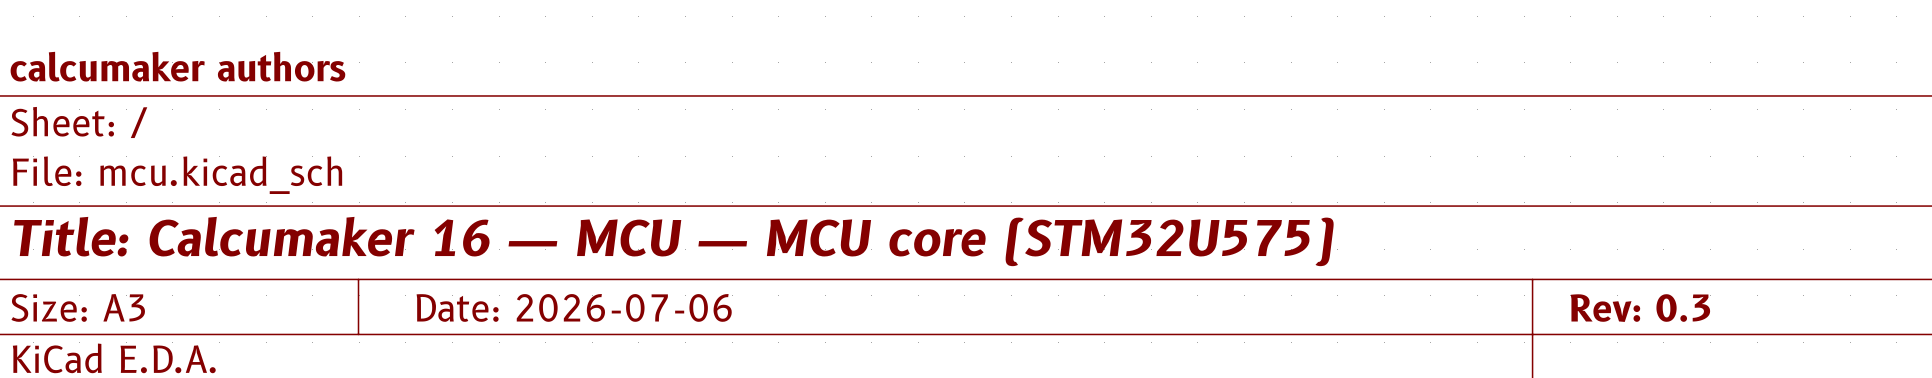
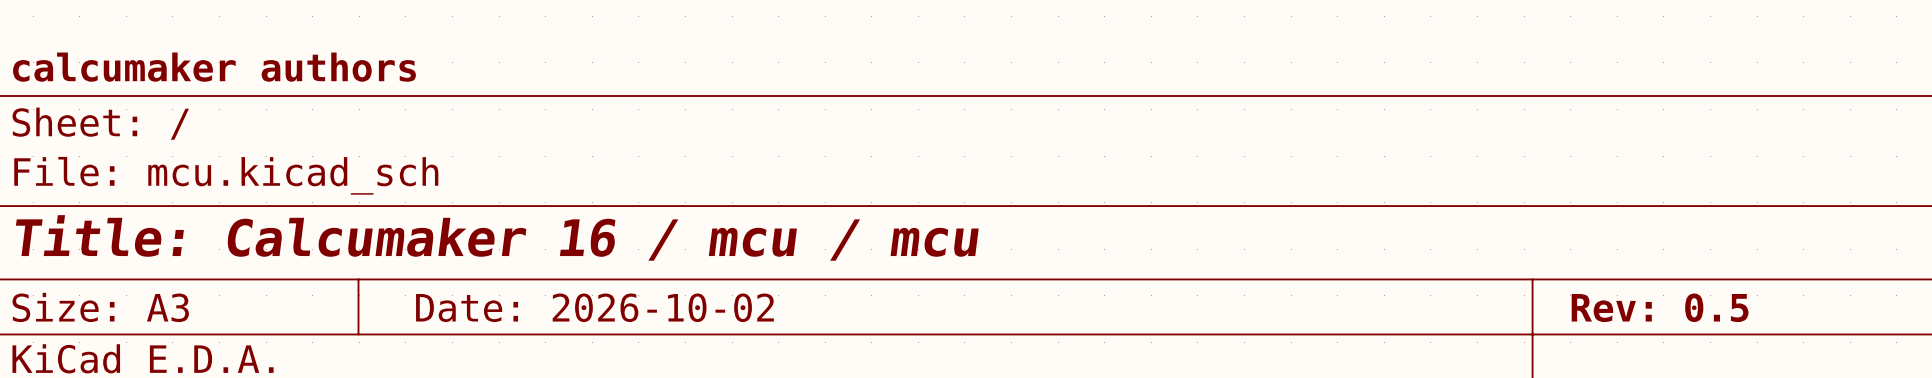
title block: Title: Calcumaker 16 — MCU — MCU core (STM32U575) (673, 241) -> Title: Calcumaker 16 / mcu / mcu (497, 237)
title block: Date: 2026-07-06 (574, 307) -> Date: 2026-10-02 (594, 307)
title block: Rev: 0.3 (1640, 308) -> Rev: 0.5 (1660, 307)

